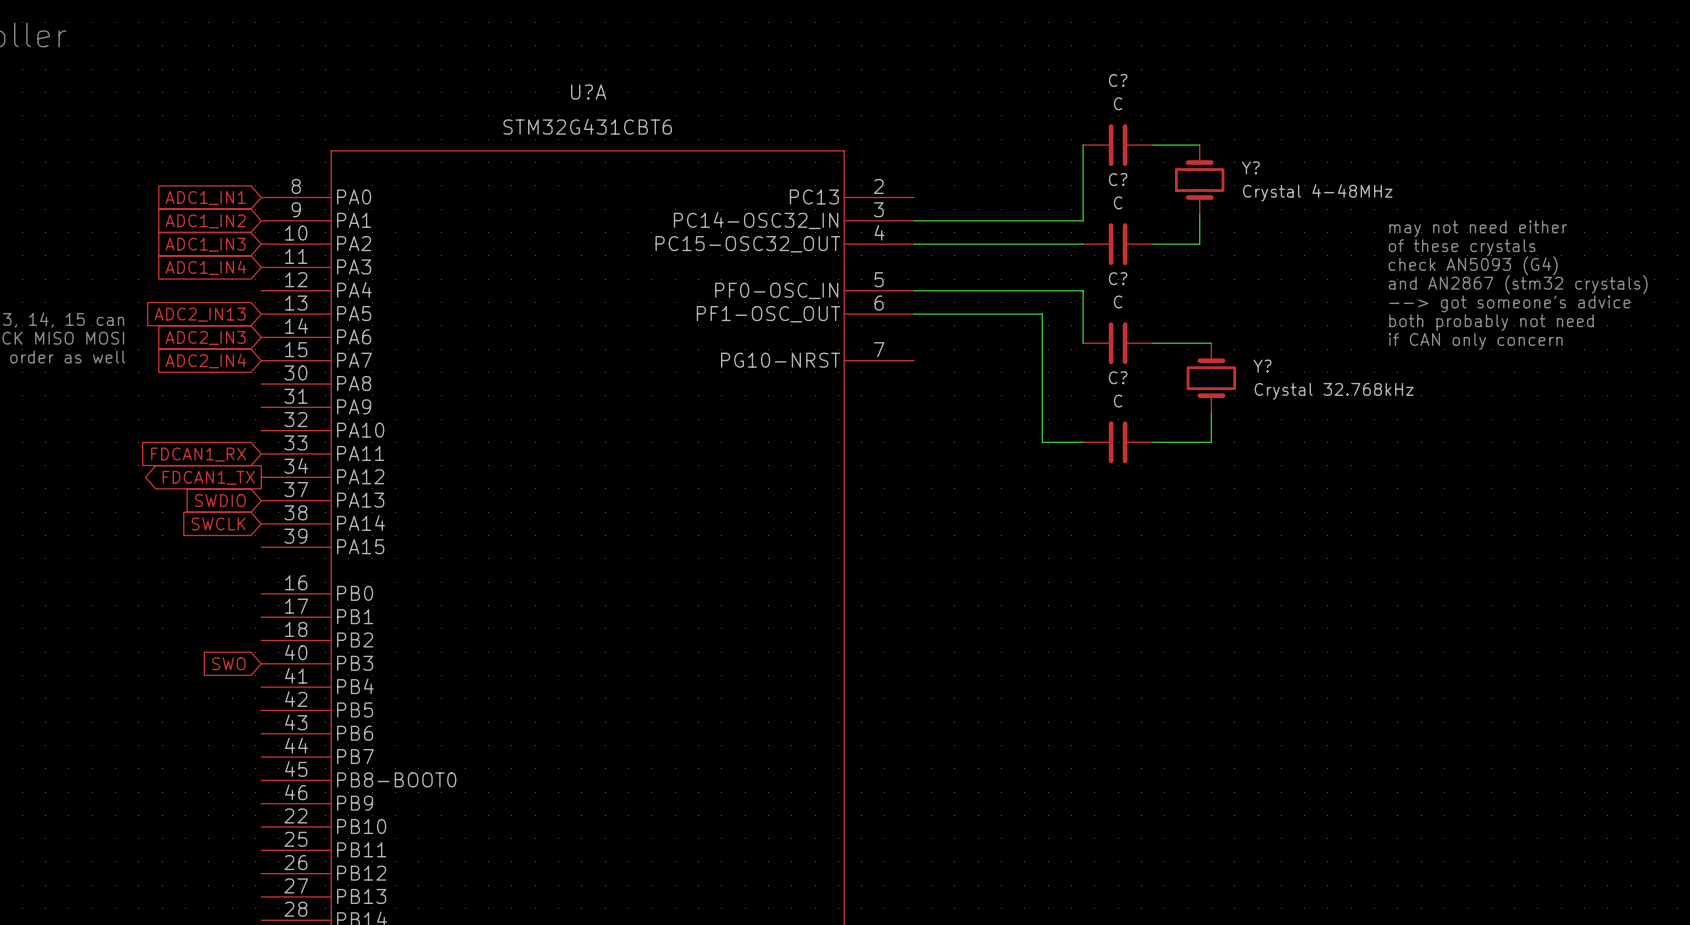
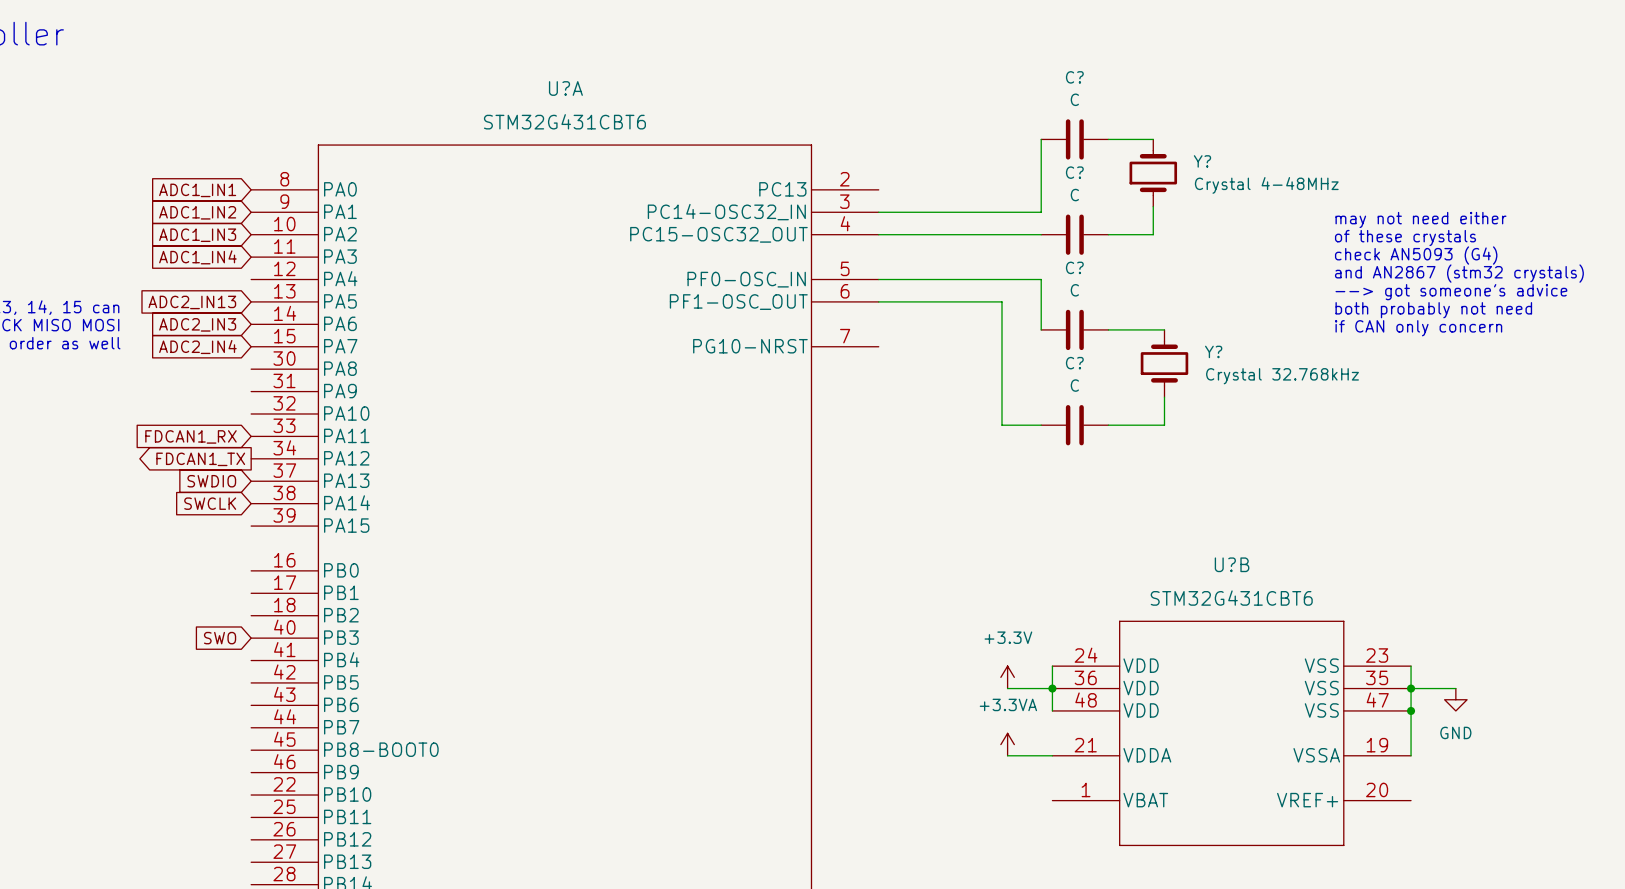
wire: none -> (1052, 666) (1052, 710)
wire: none -> (1411, 666) (1411, 755)
power symbol: none -> +3.3V (1007, 677)
wire: none -> (1007, 688) (1052, 688)
junction: none -> (1052, 688)
wire: none -> (1411, 688) (1455, 688)
junction: none -> (1411, 688)
power symbol: none -> GND (1455, 699)
junction: none -> (1411, 710)
U?B: none -> STM32G431CBT6 (1231, 733)
power symbol: none -> +3.3VA (1007, 744)
wire: none -> (1007, 755) (1052, 755)

